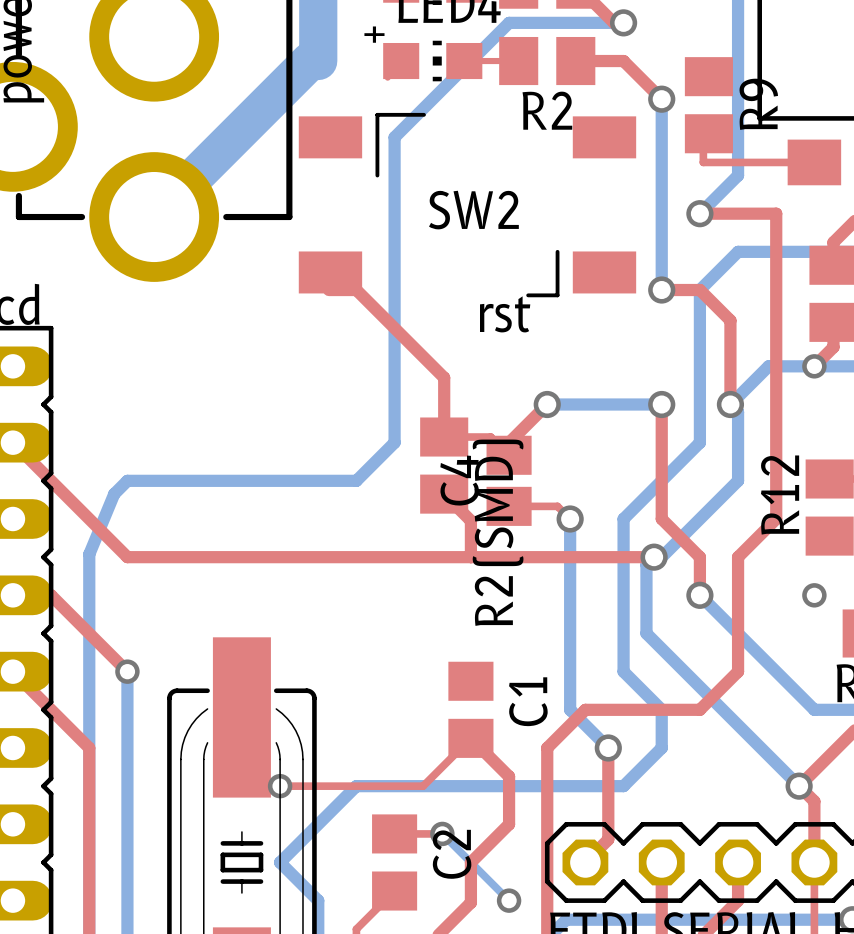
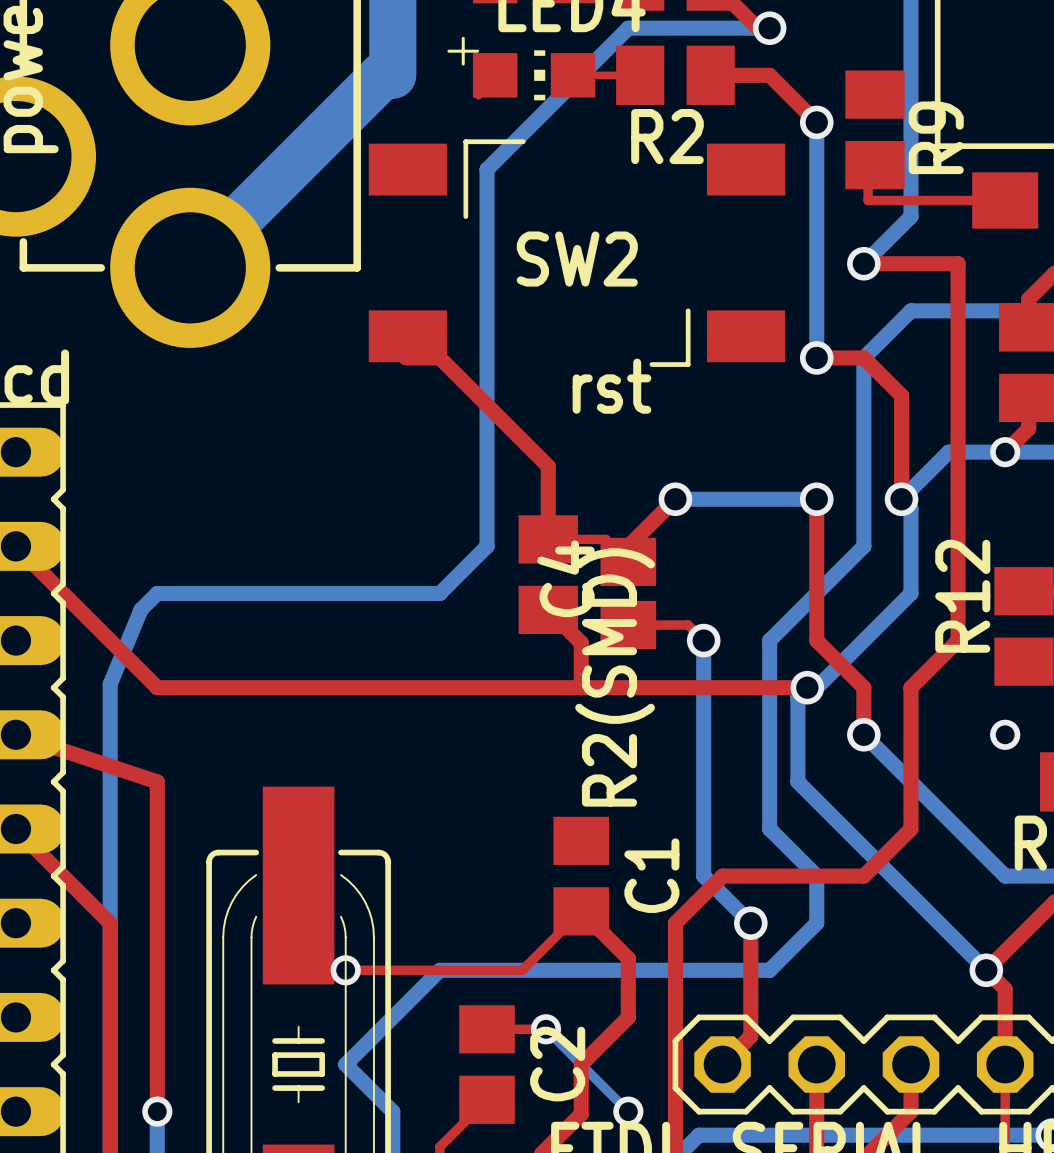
top track: (12, 595) (51, 595) (127, 671) -> (15, 734) (157, 781) (157, 1111)
bottom track: (127, 671) (127, 900) -> none
via: (127, 671) -> none
via: none -> (157, 1111)

